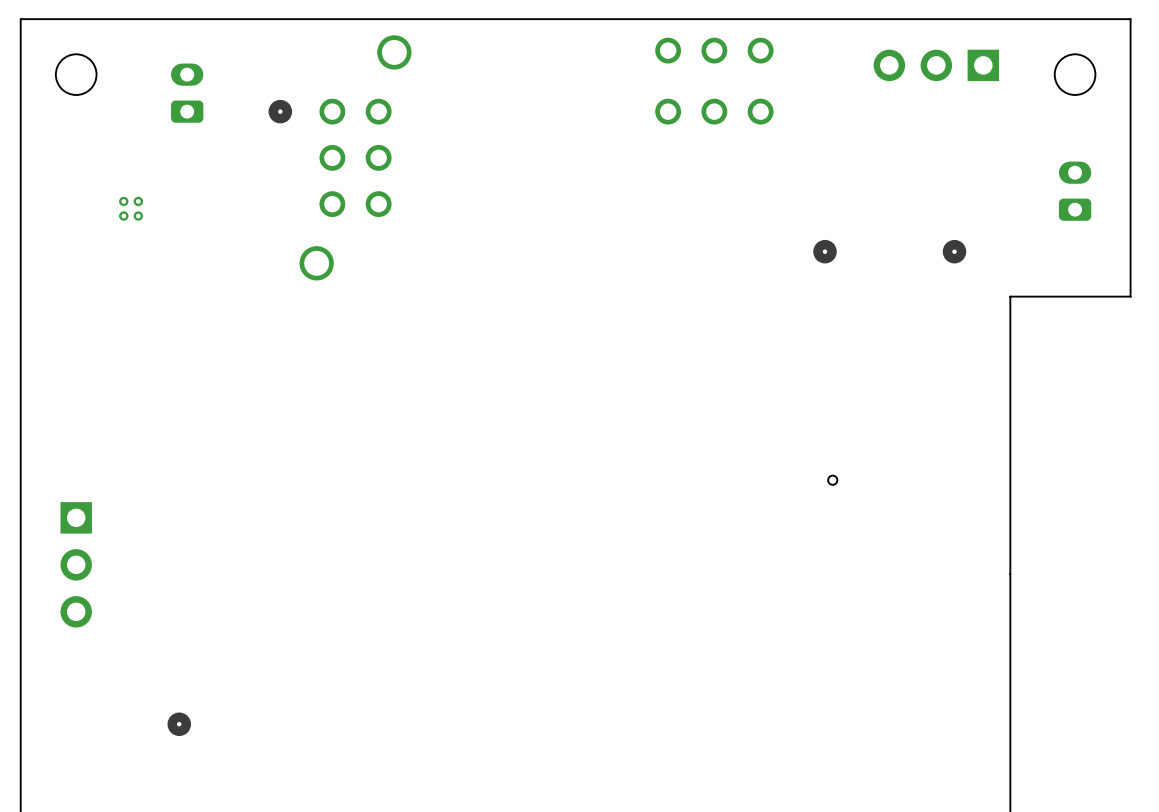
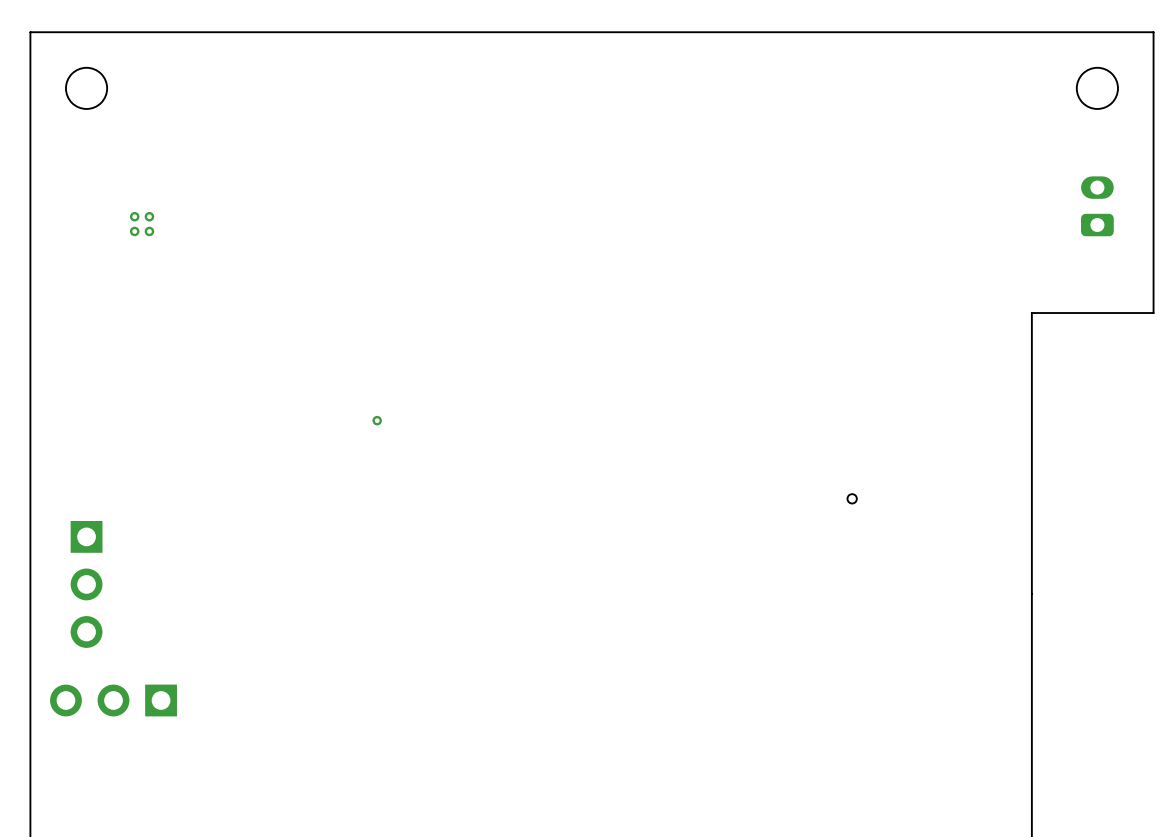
part: (936, 65) -> none
part: (714, 81) -> none
part: (187, 93) -> none
part: (340, 157) -> none
part: (825, 251) -> none
part: (954, 251) -> none
part: none -> (377, 420)
part: none -> (113, 700)
part: (179, 724) -> none

